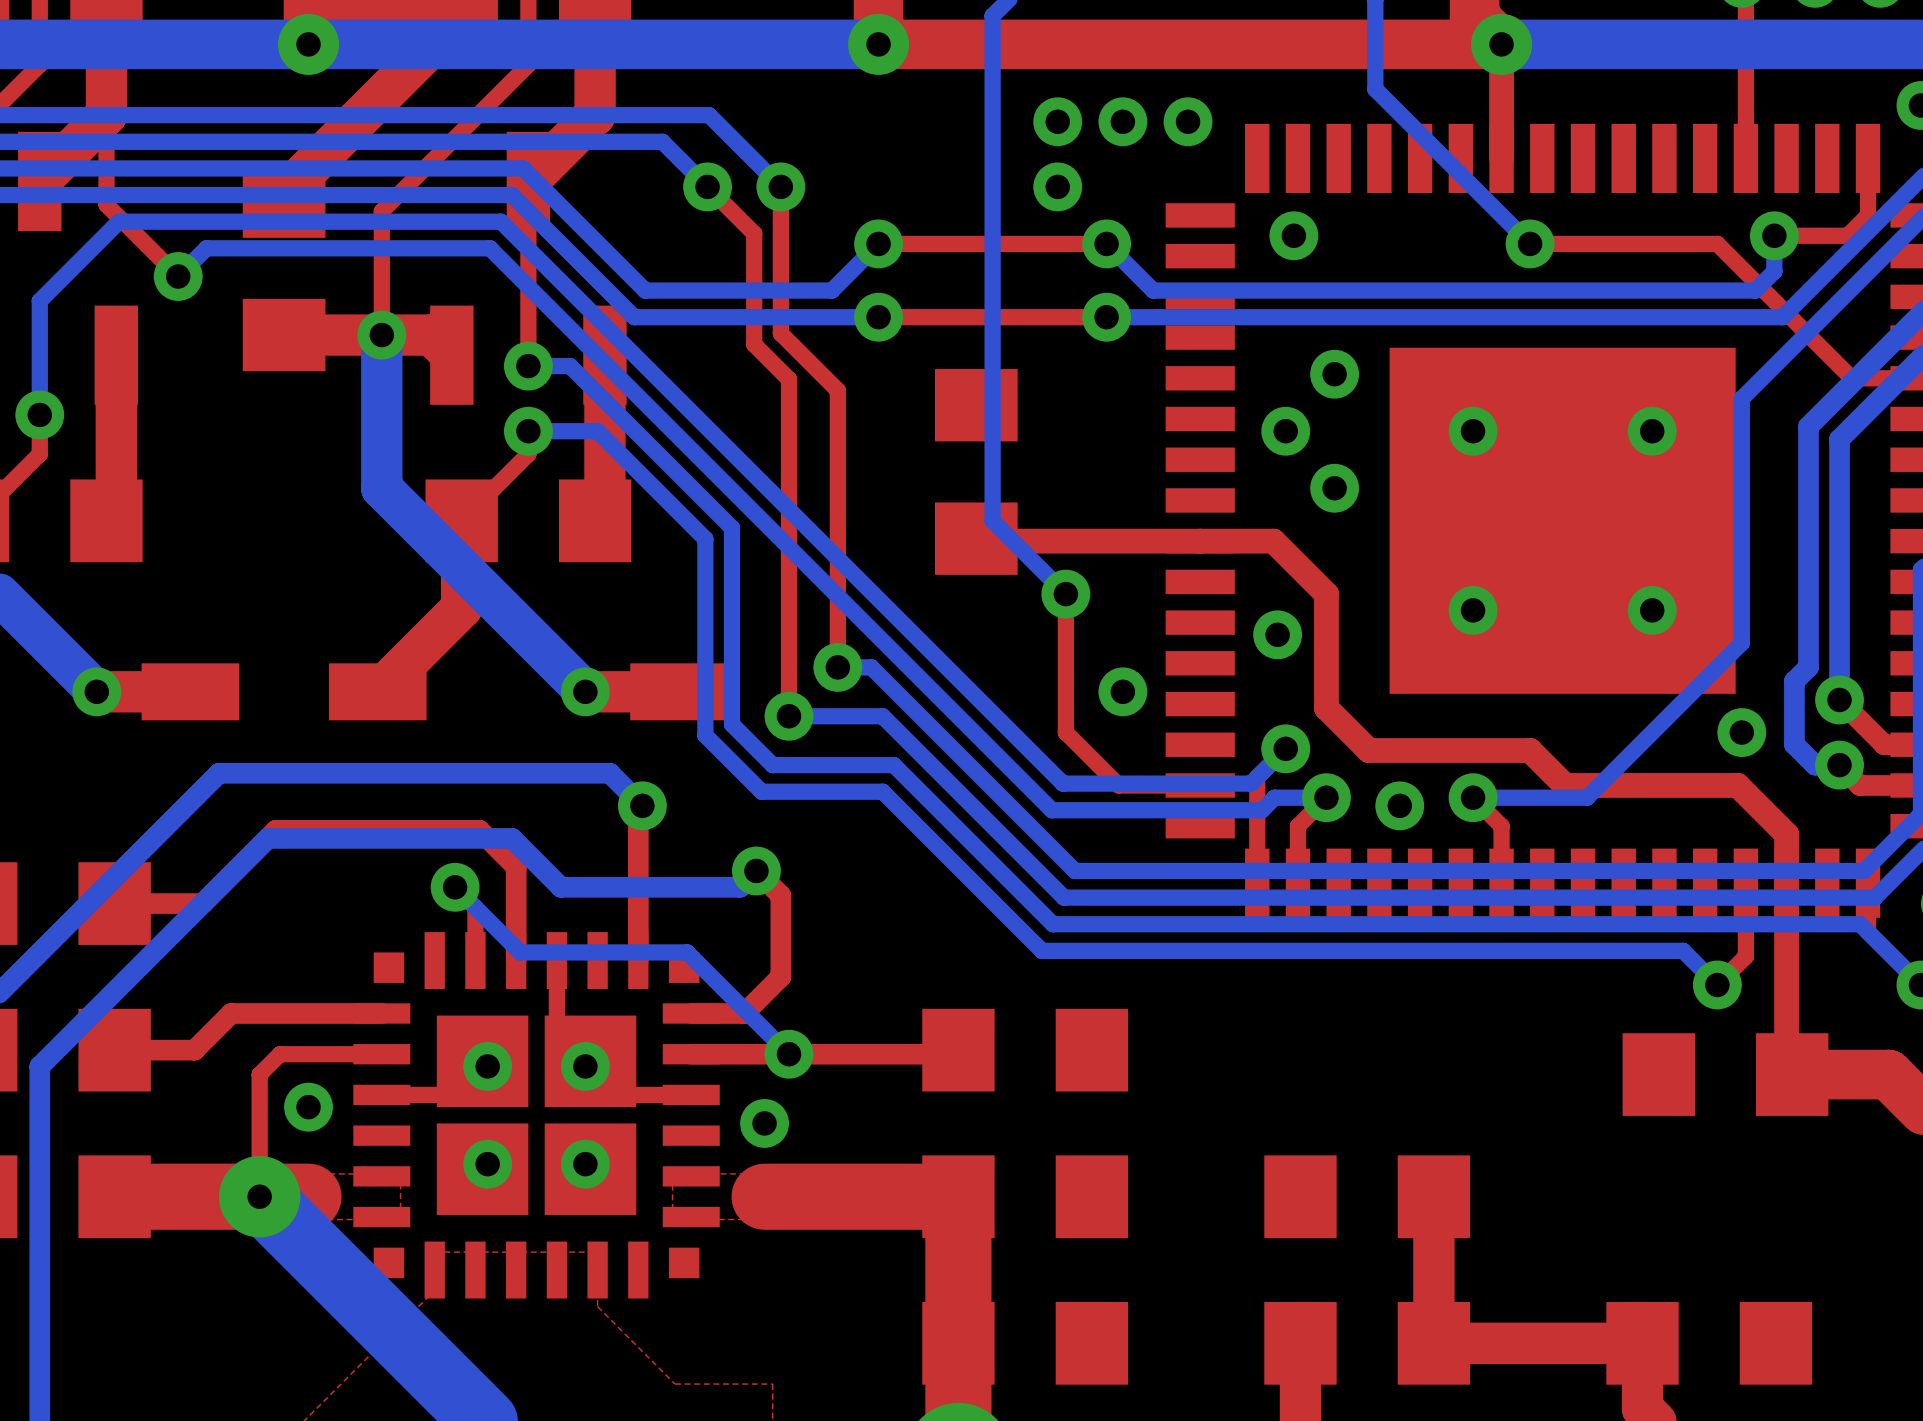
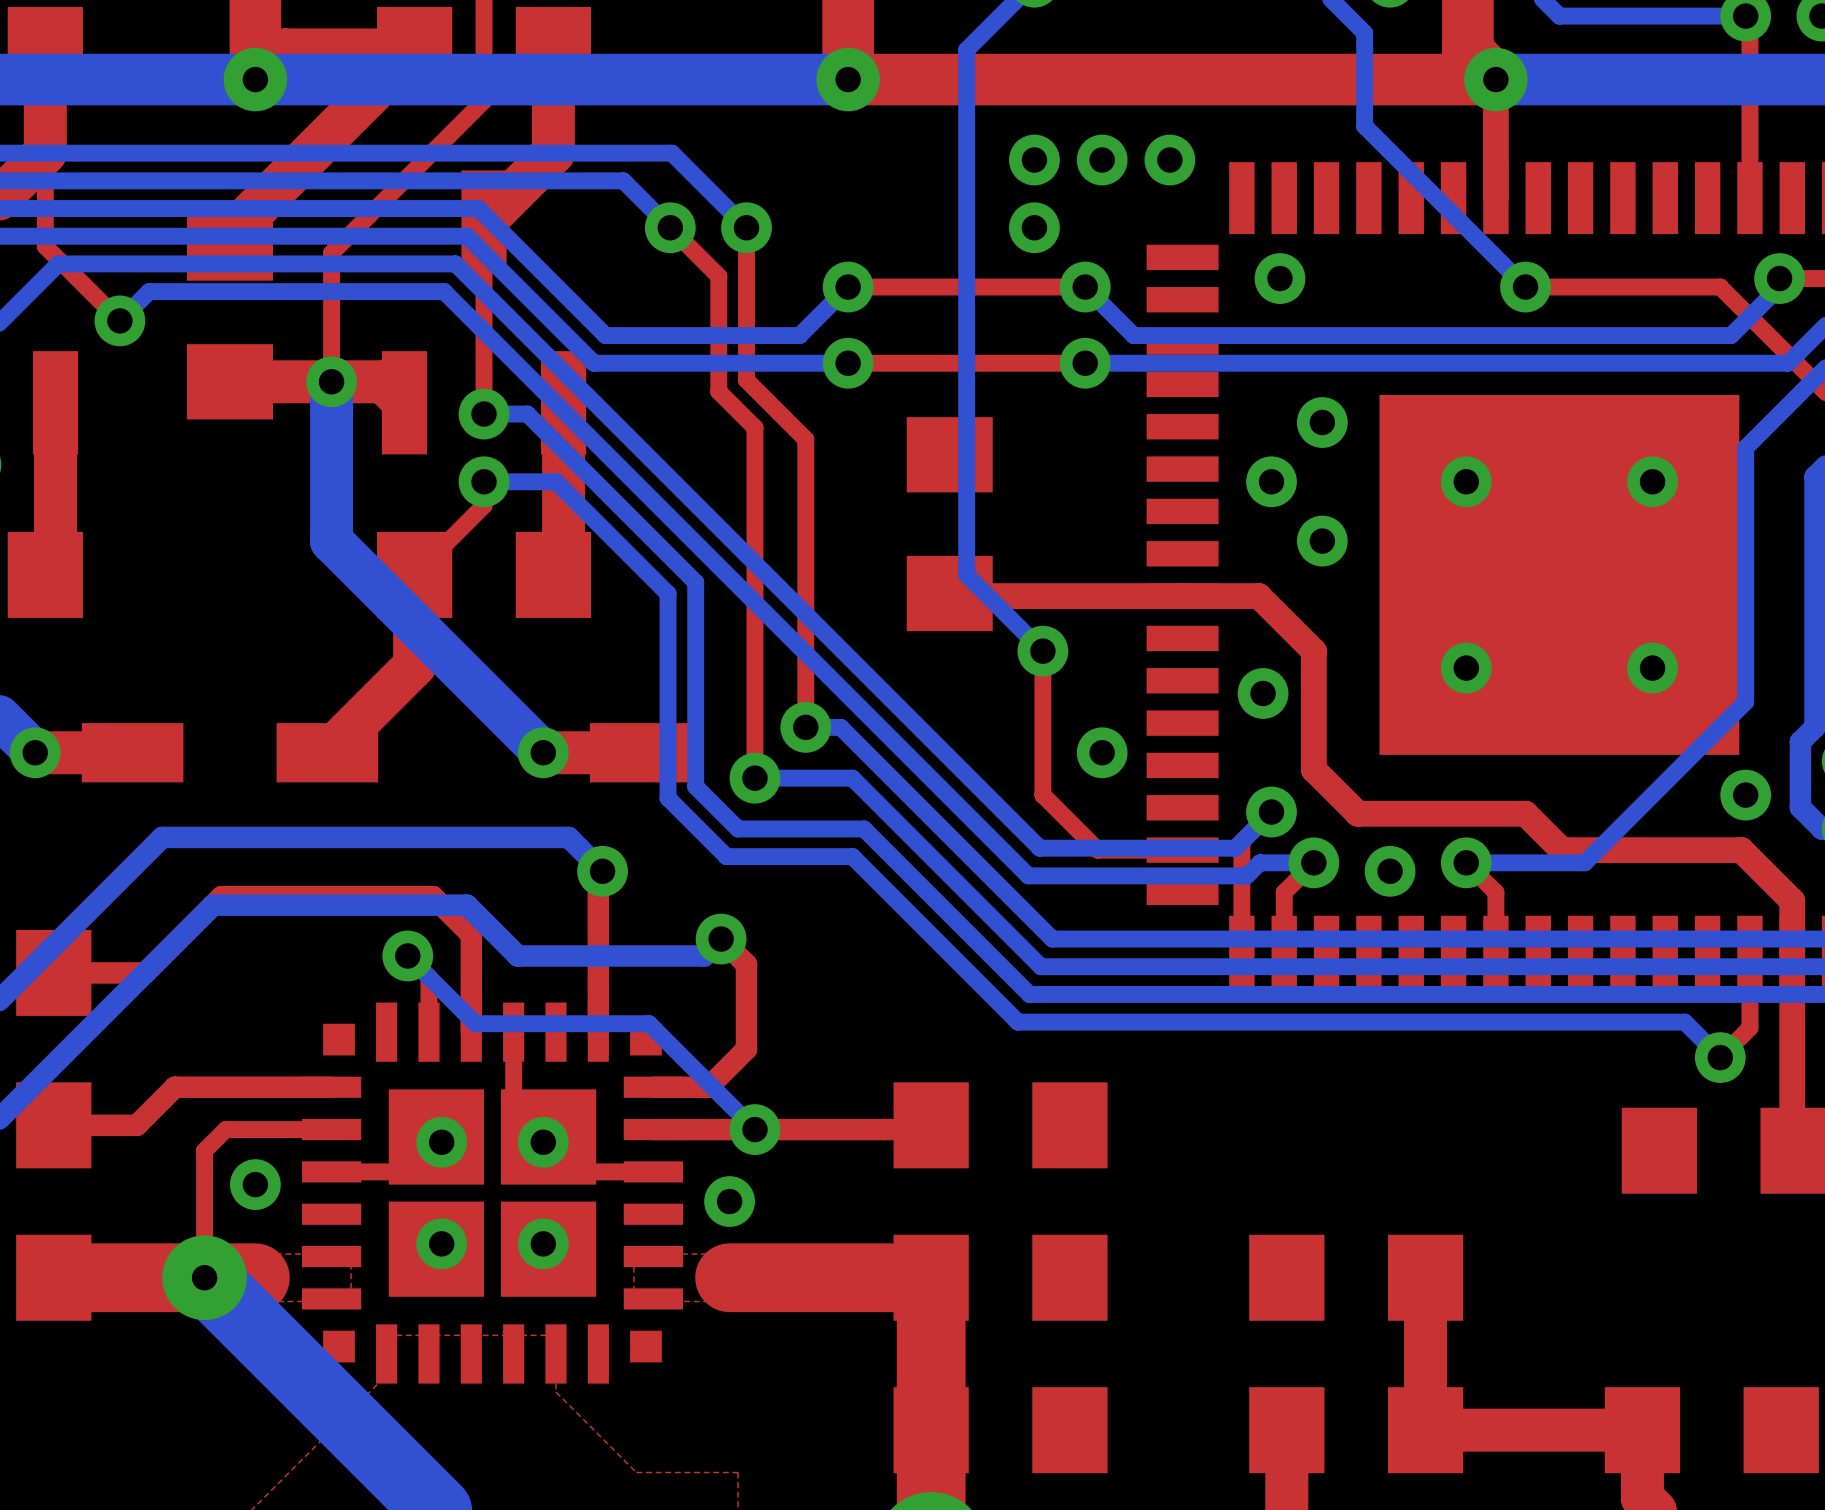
bottom track: (1774, 235) (1774, 271) (1755, 290) (1727, 290) -> (1788, 278) (1731, 335)

